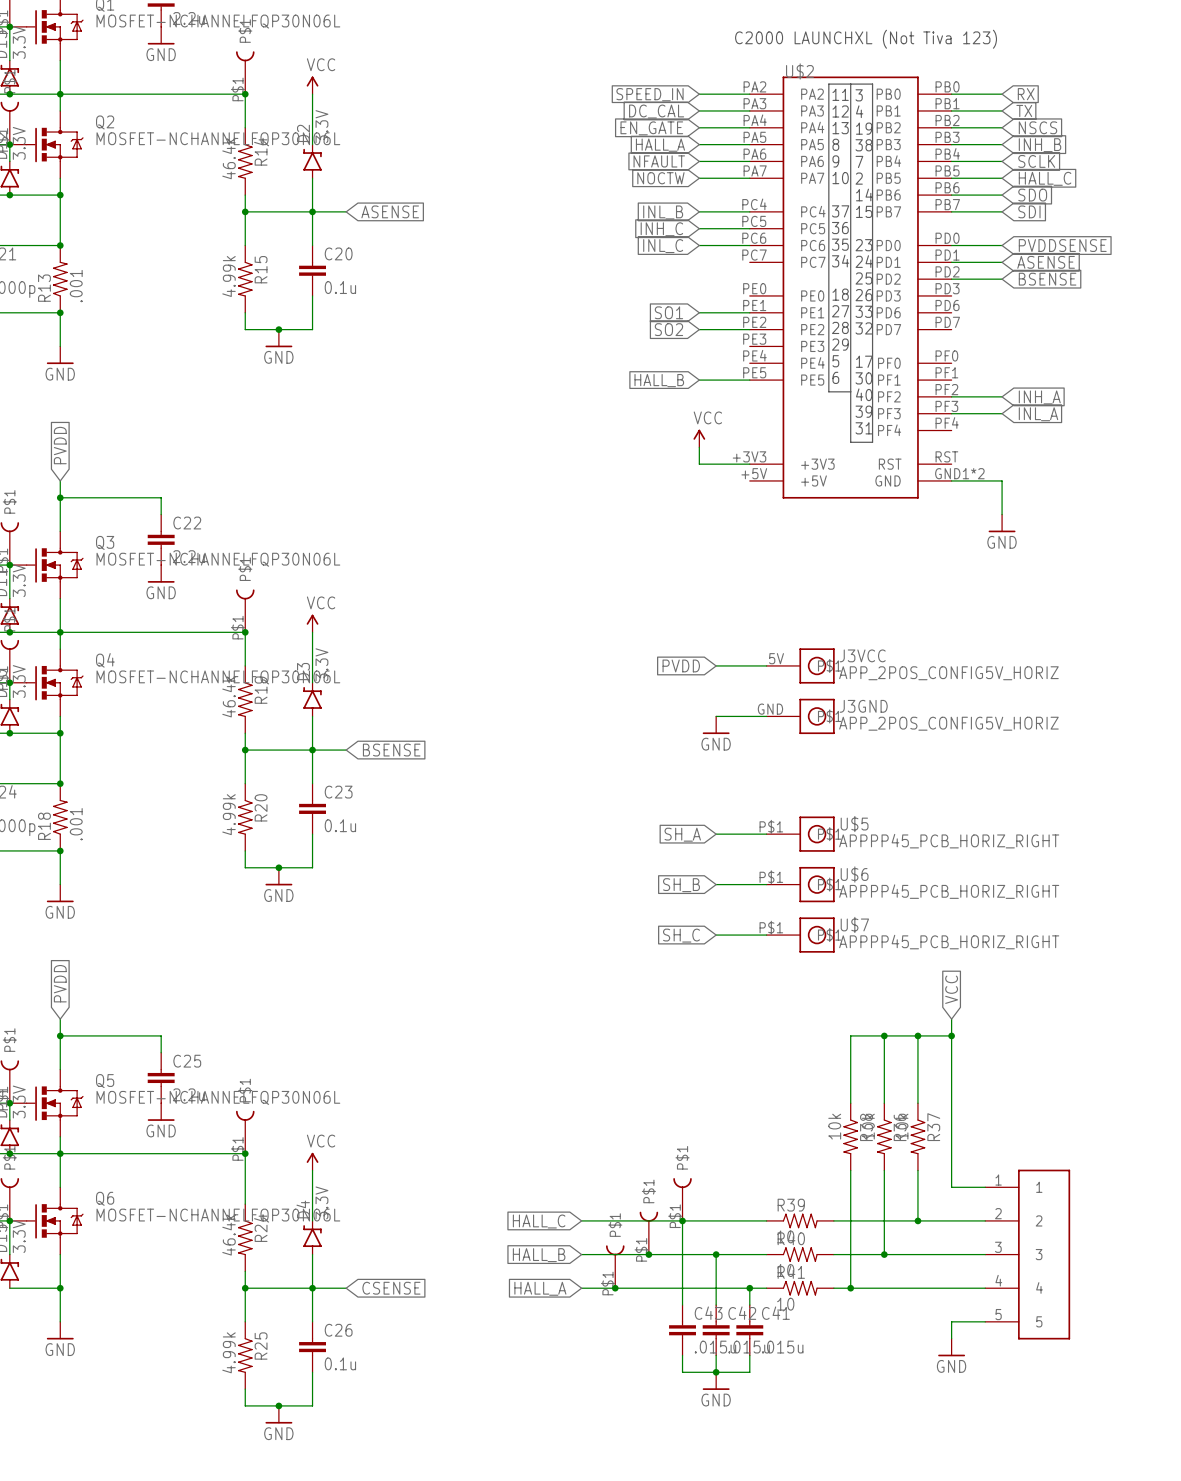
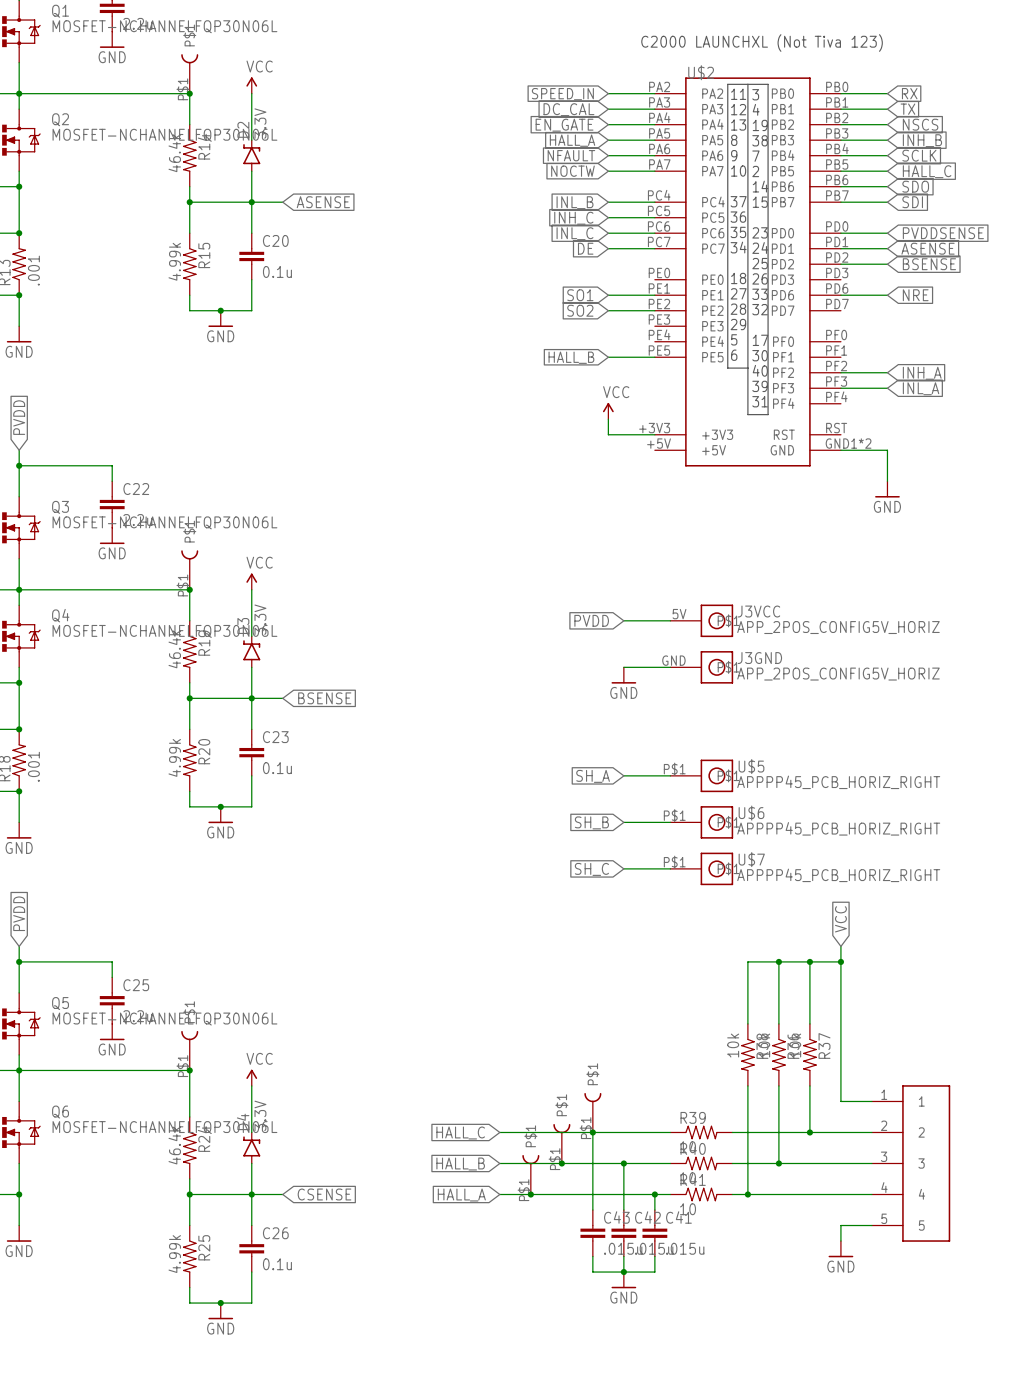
global label: none -> DE (585, 248)
wire: none -> (608, 248) (654, 248)
wire: none -> (840, 295) (887, 295)
global label: none -> NRE (915, 295)

